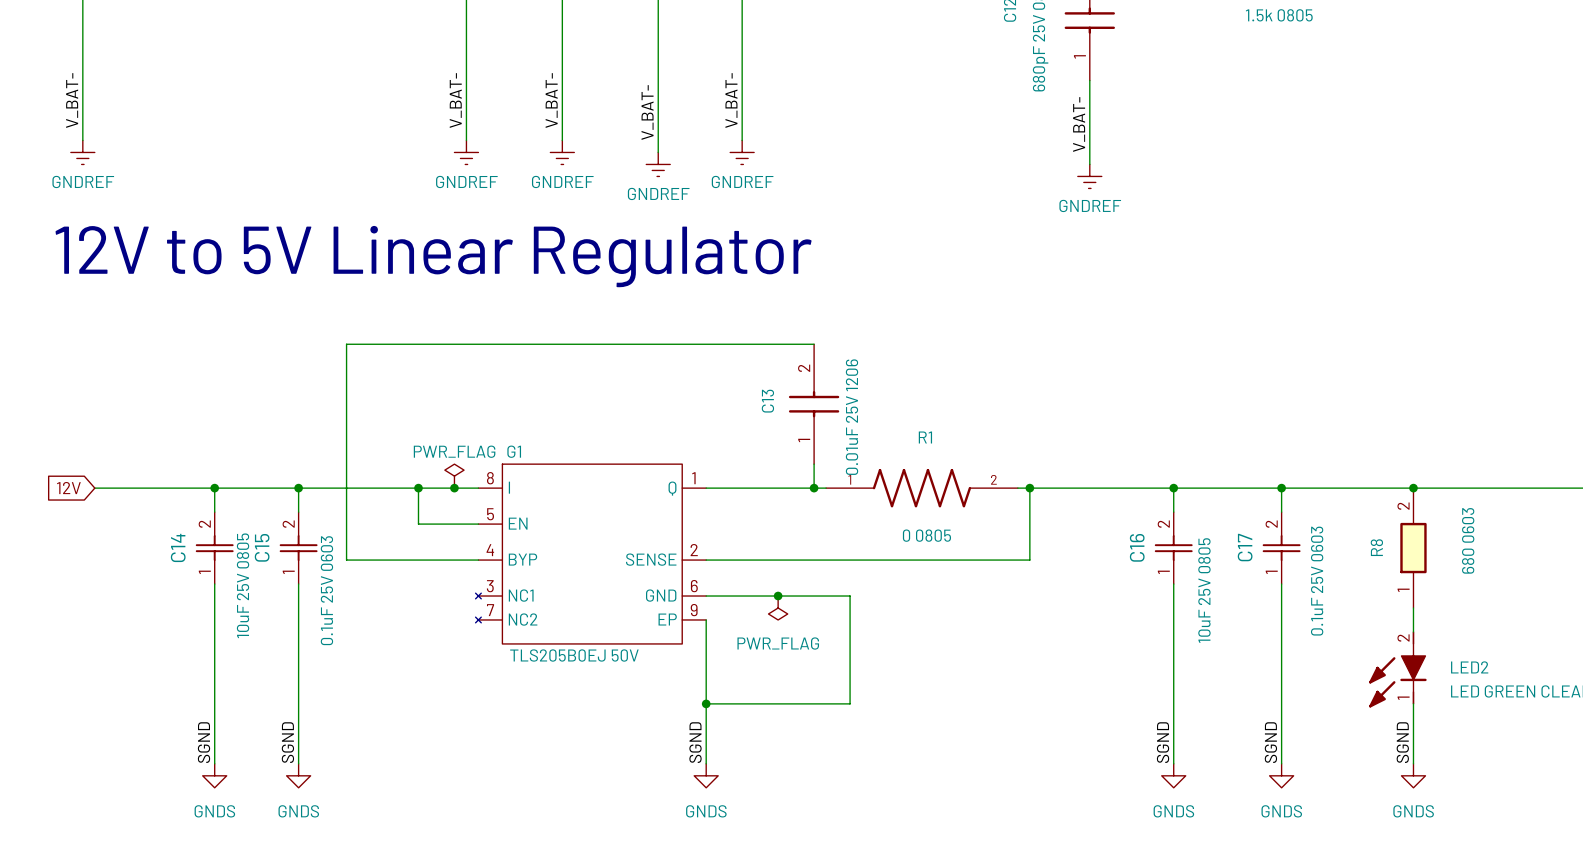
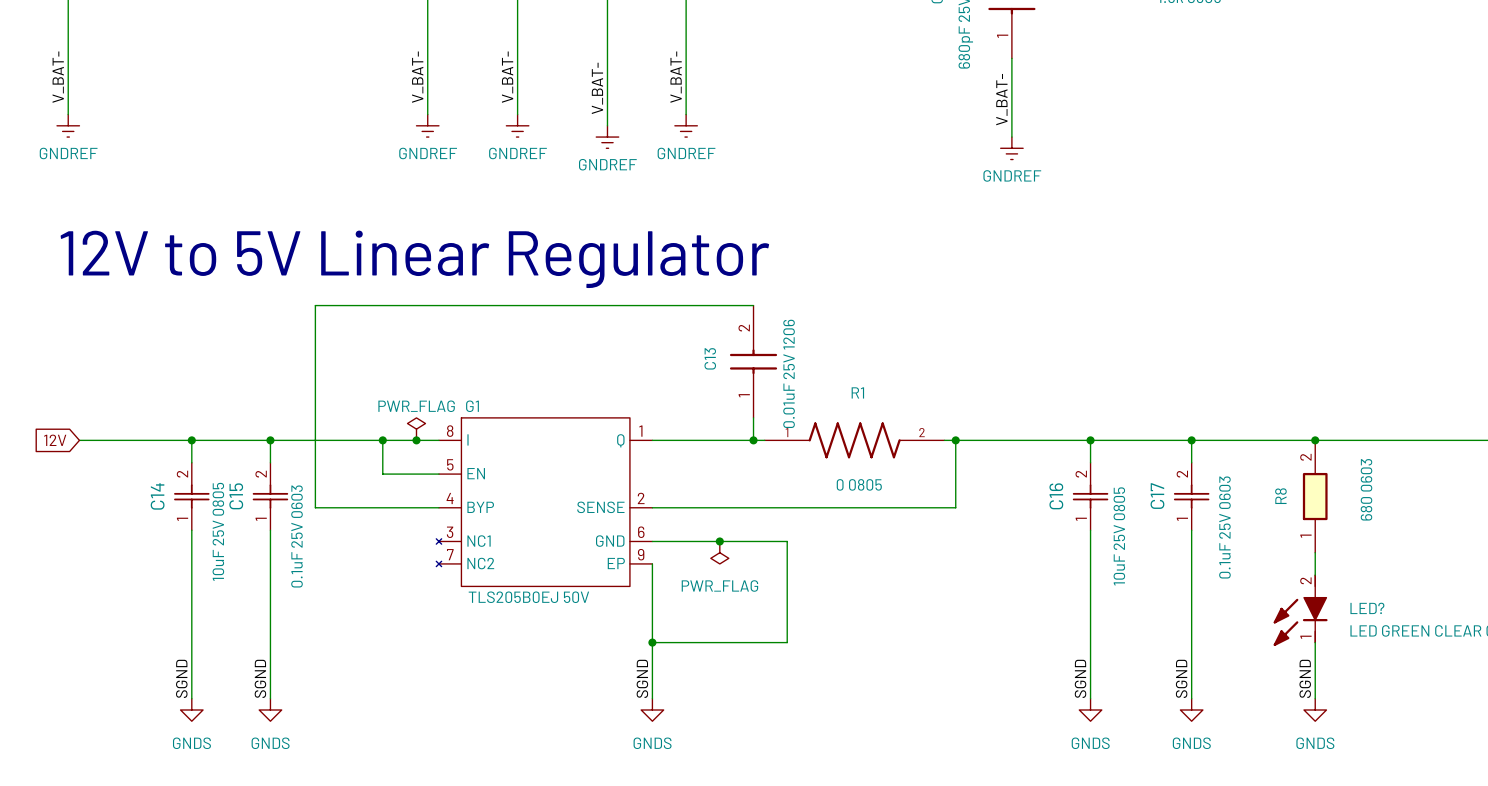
text position: 12V to 5V Linear Regulator (433, 256) -> 12V to 5V Linear Regulator (414, 259)
LED2 name: LED2 (1469, 667) -> LED? (1367, 608)

